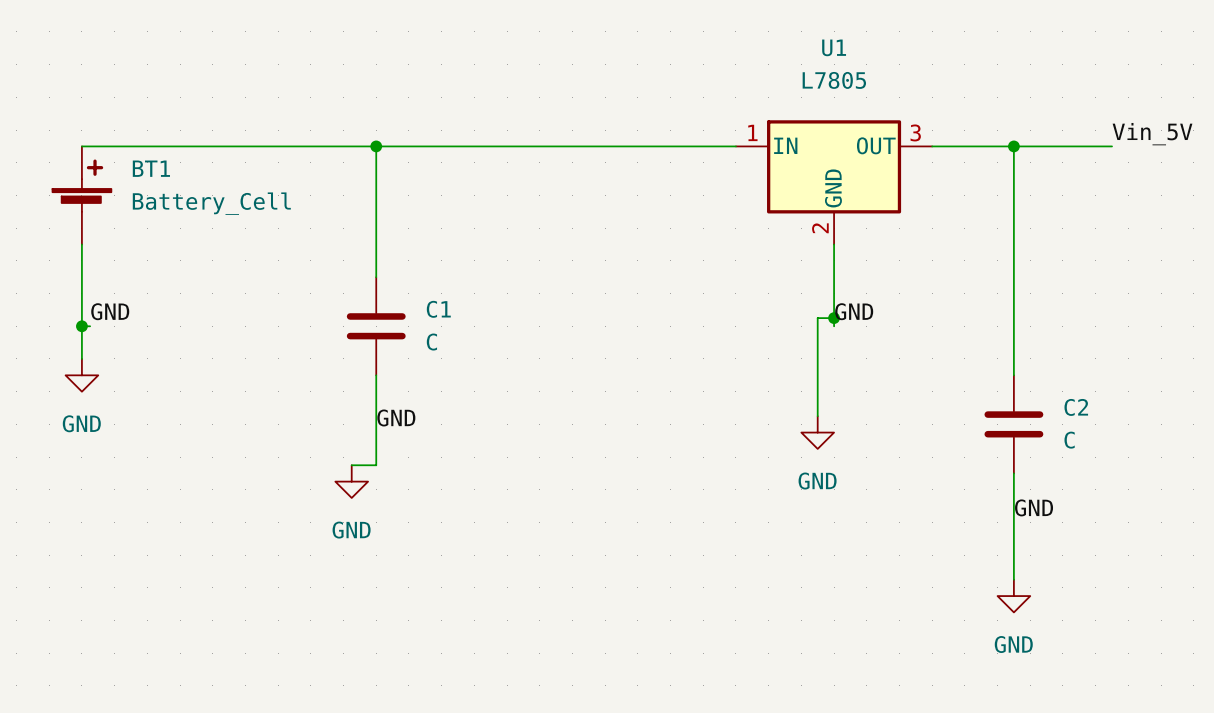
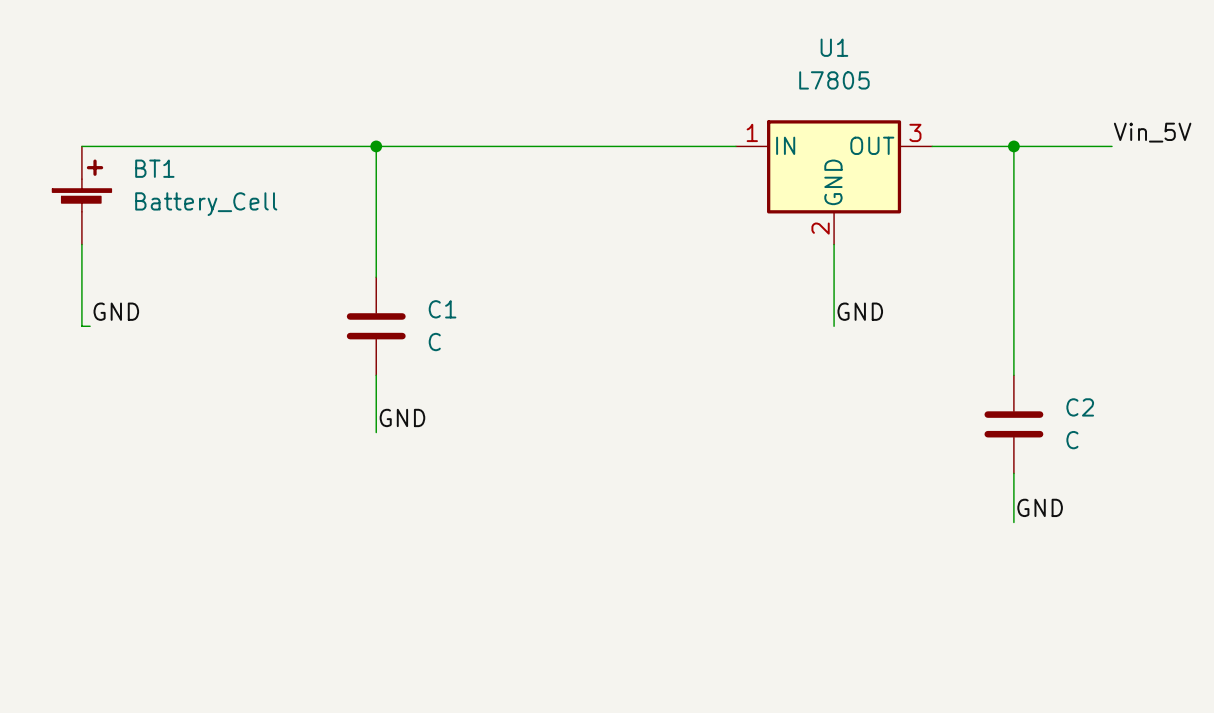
wire: (834, 318) (817, 318) (817, 416) -> none
junction: (834, 318) -> none
wire: (81, 326) (81, 358) -> none
junction: (81, 326) -> none
power symbol: GND (81, 375) -> none
wire: (376, 432) (376, 465) (351, 465) -> none
power symbol: GND (817, 432) -> none
power symbol: GND (351, 481) -> none
wire: (1013, 522) (1013, 579) -> none
power symbol: GND (1013, 596) -> none

